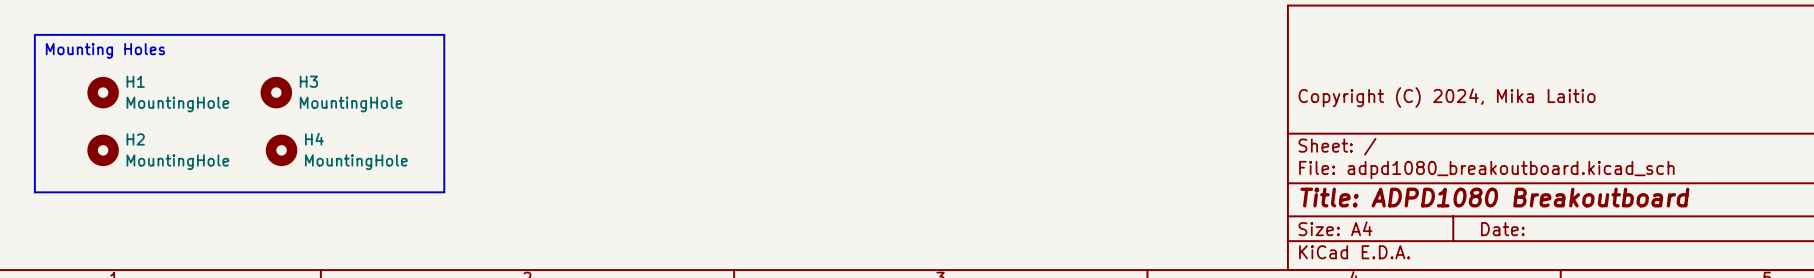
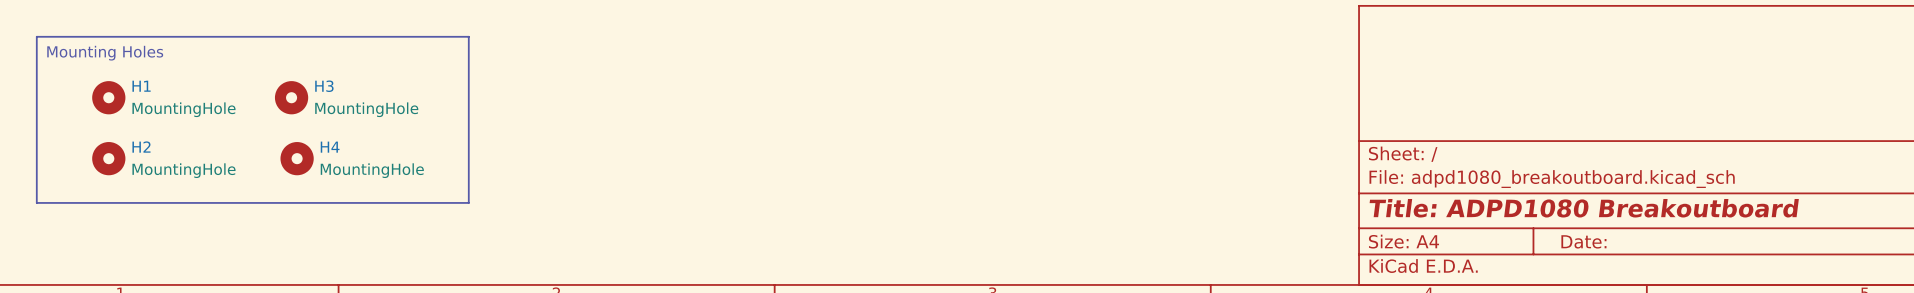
title block: Copyright (C) 2024, Mika Laitio (1447, 97) -> none

